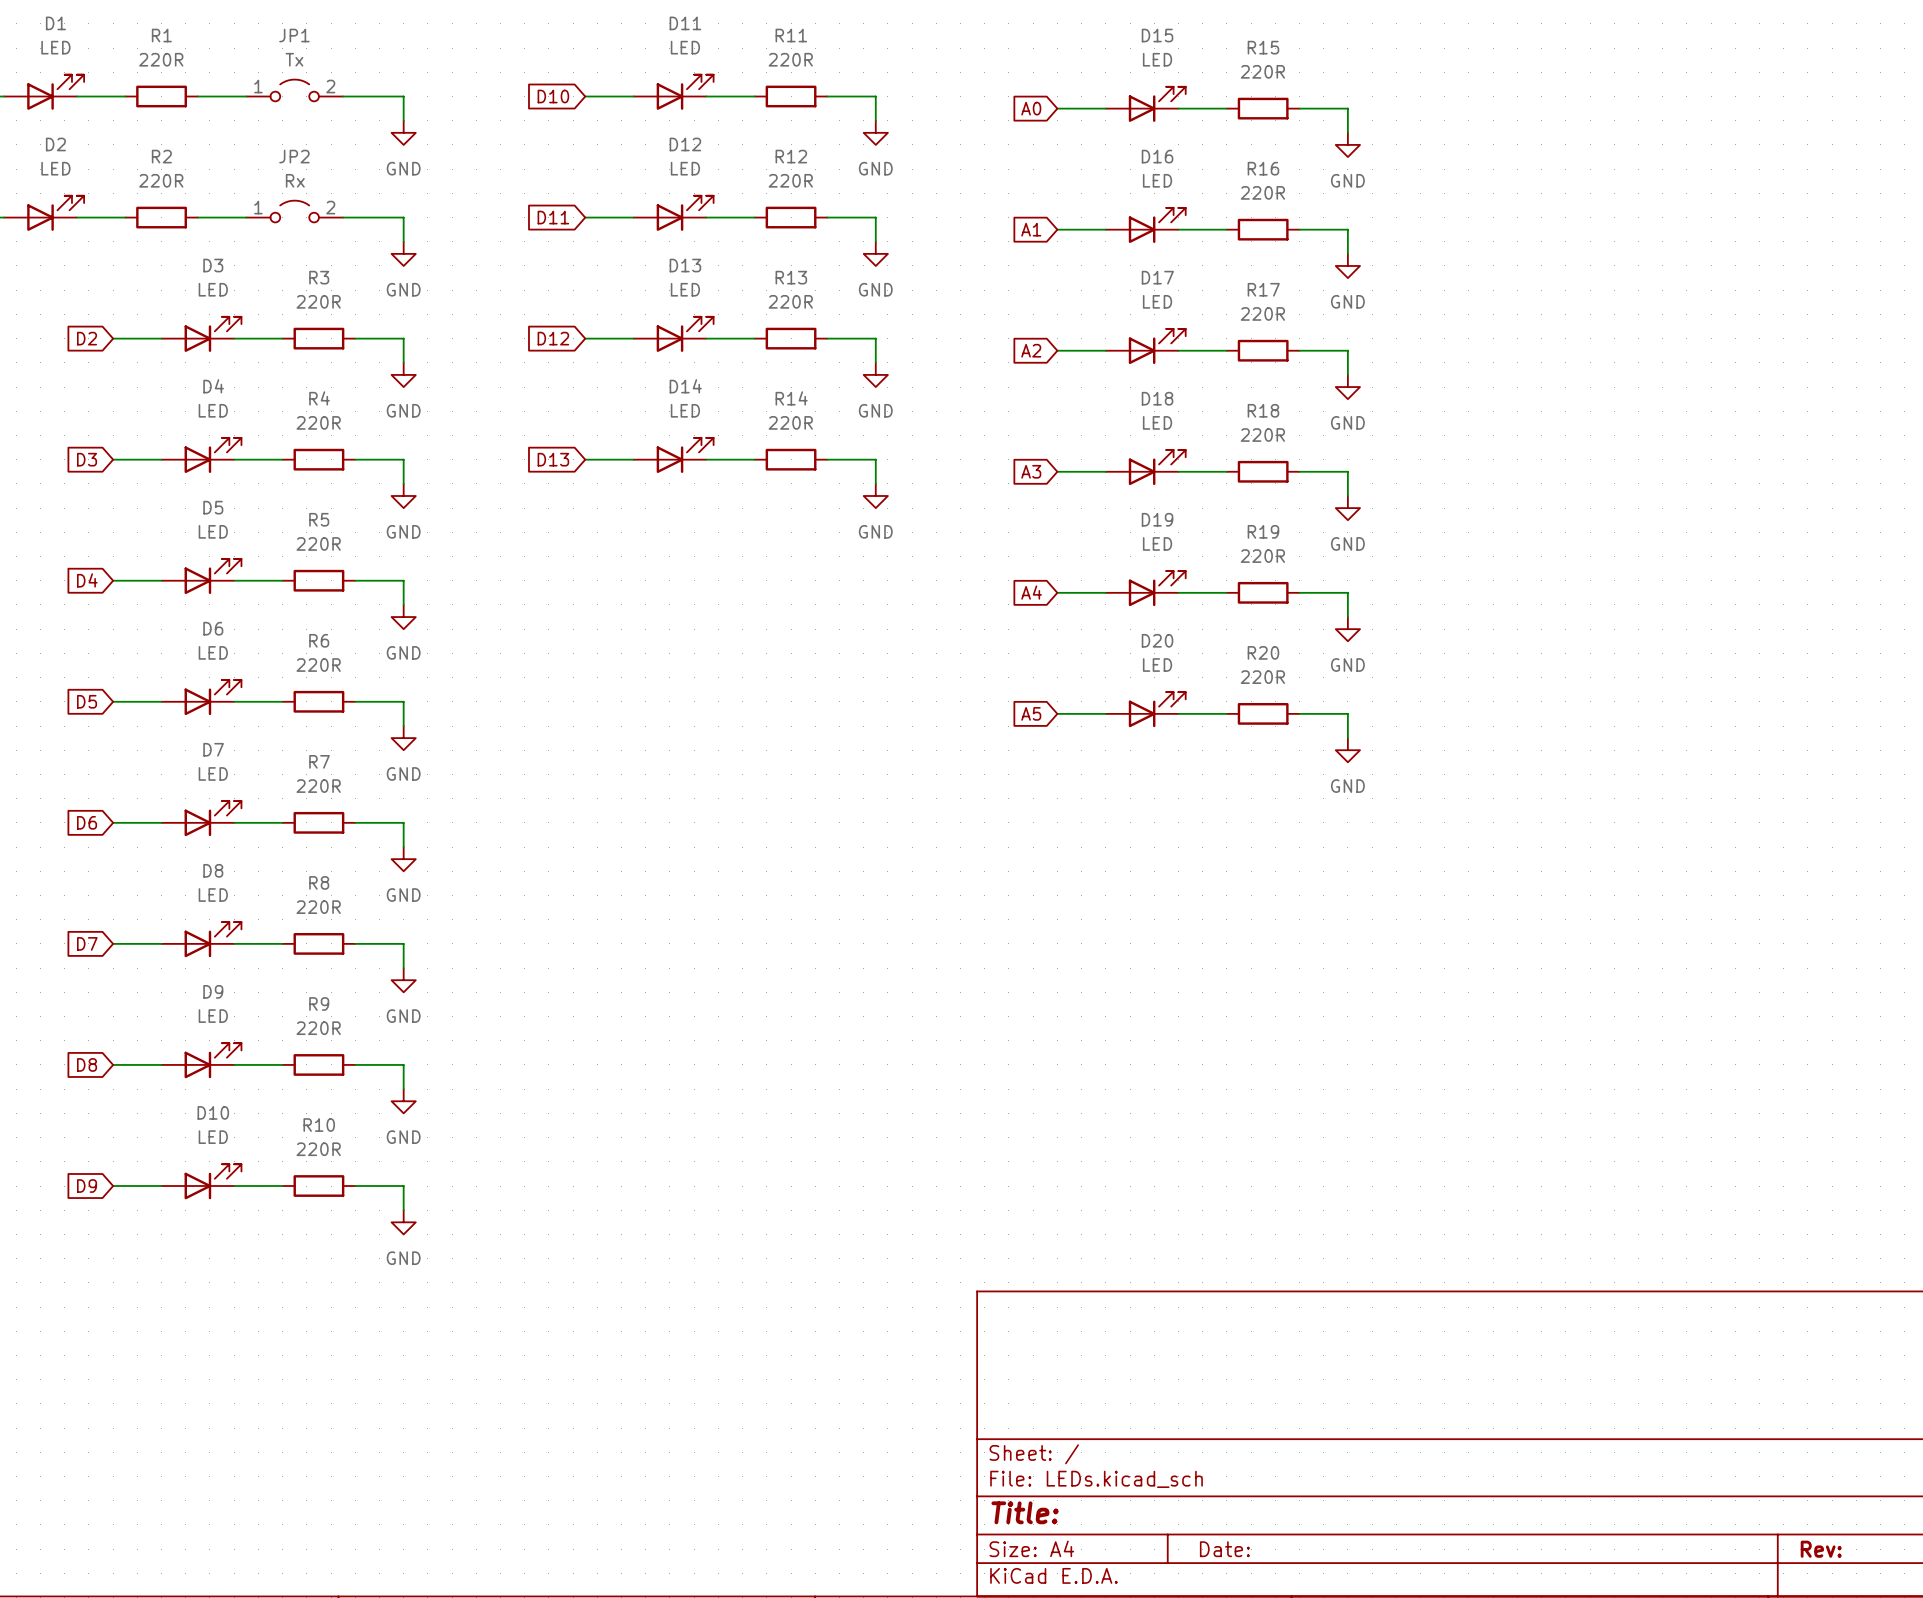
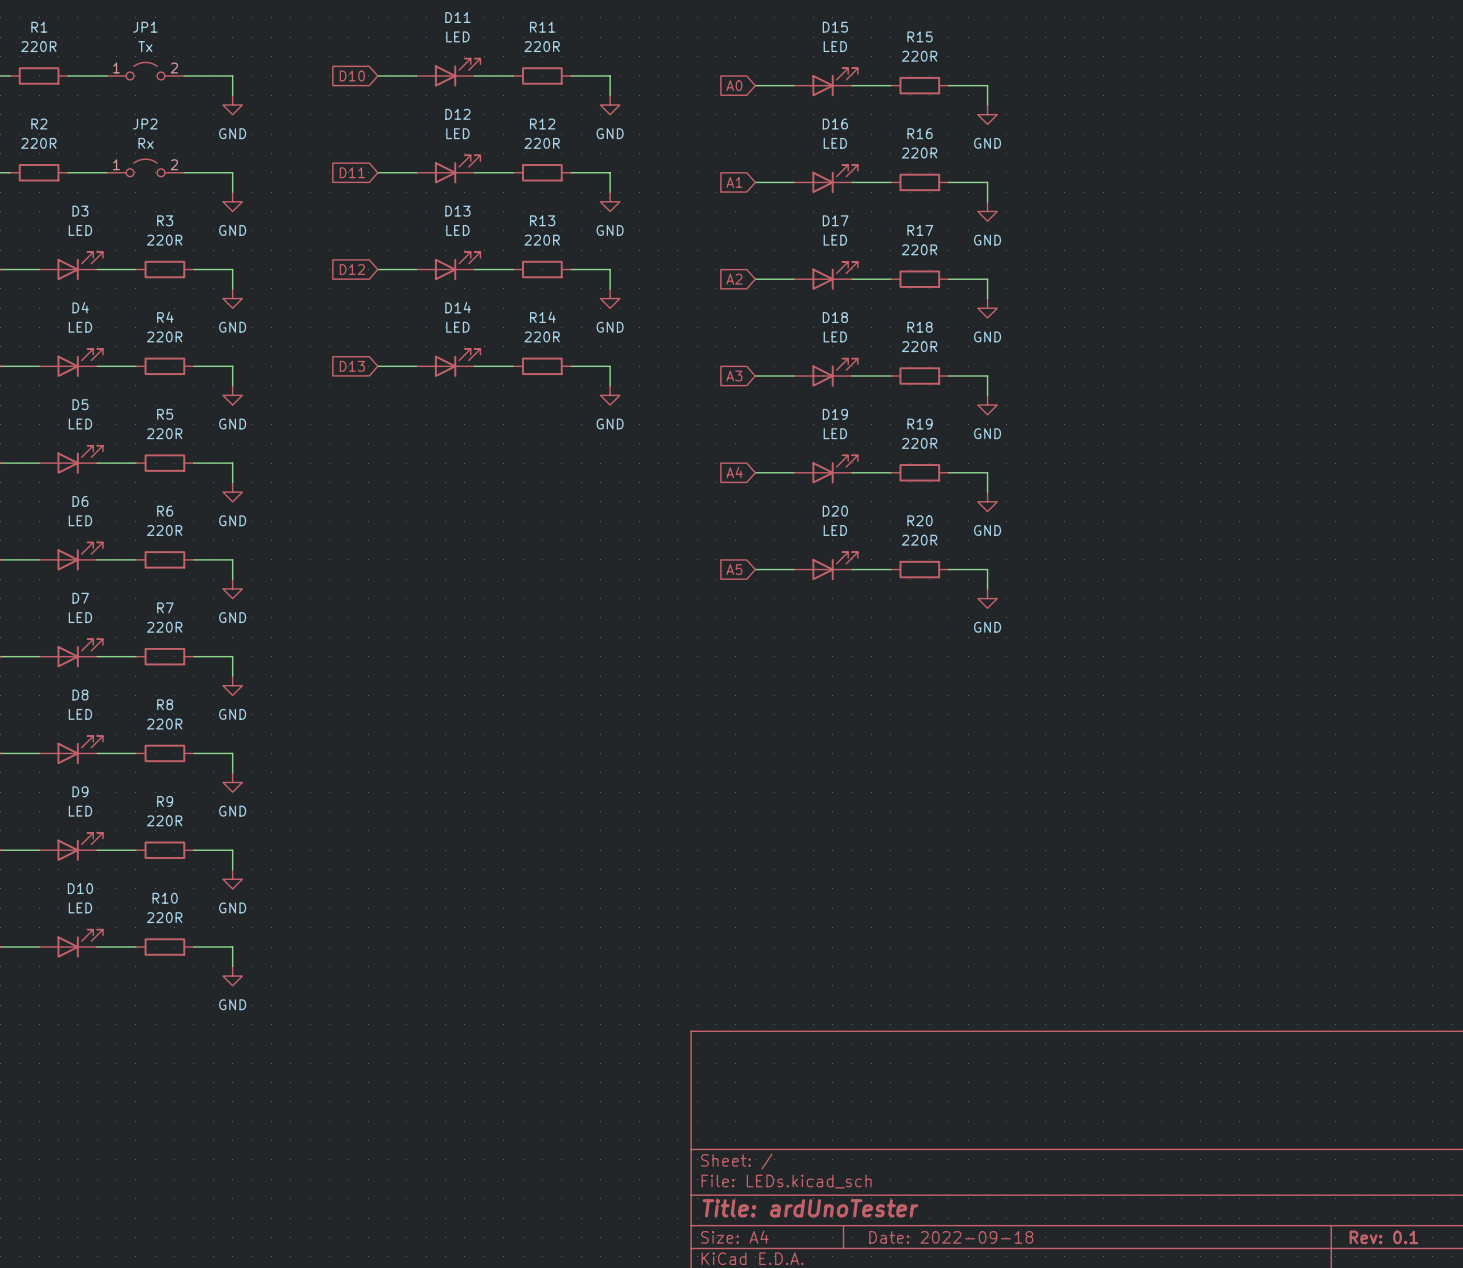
title block: Title: (1025, 1512) -> Title: ardUnoTester (810, 1208)
title block: Date: (1224, 1549) -> Date: 2022-09-18 (951, 1237)
title block: Rev: (1821, 1549) -> Rev: 0.1 (1383, 1237)

